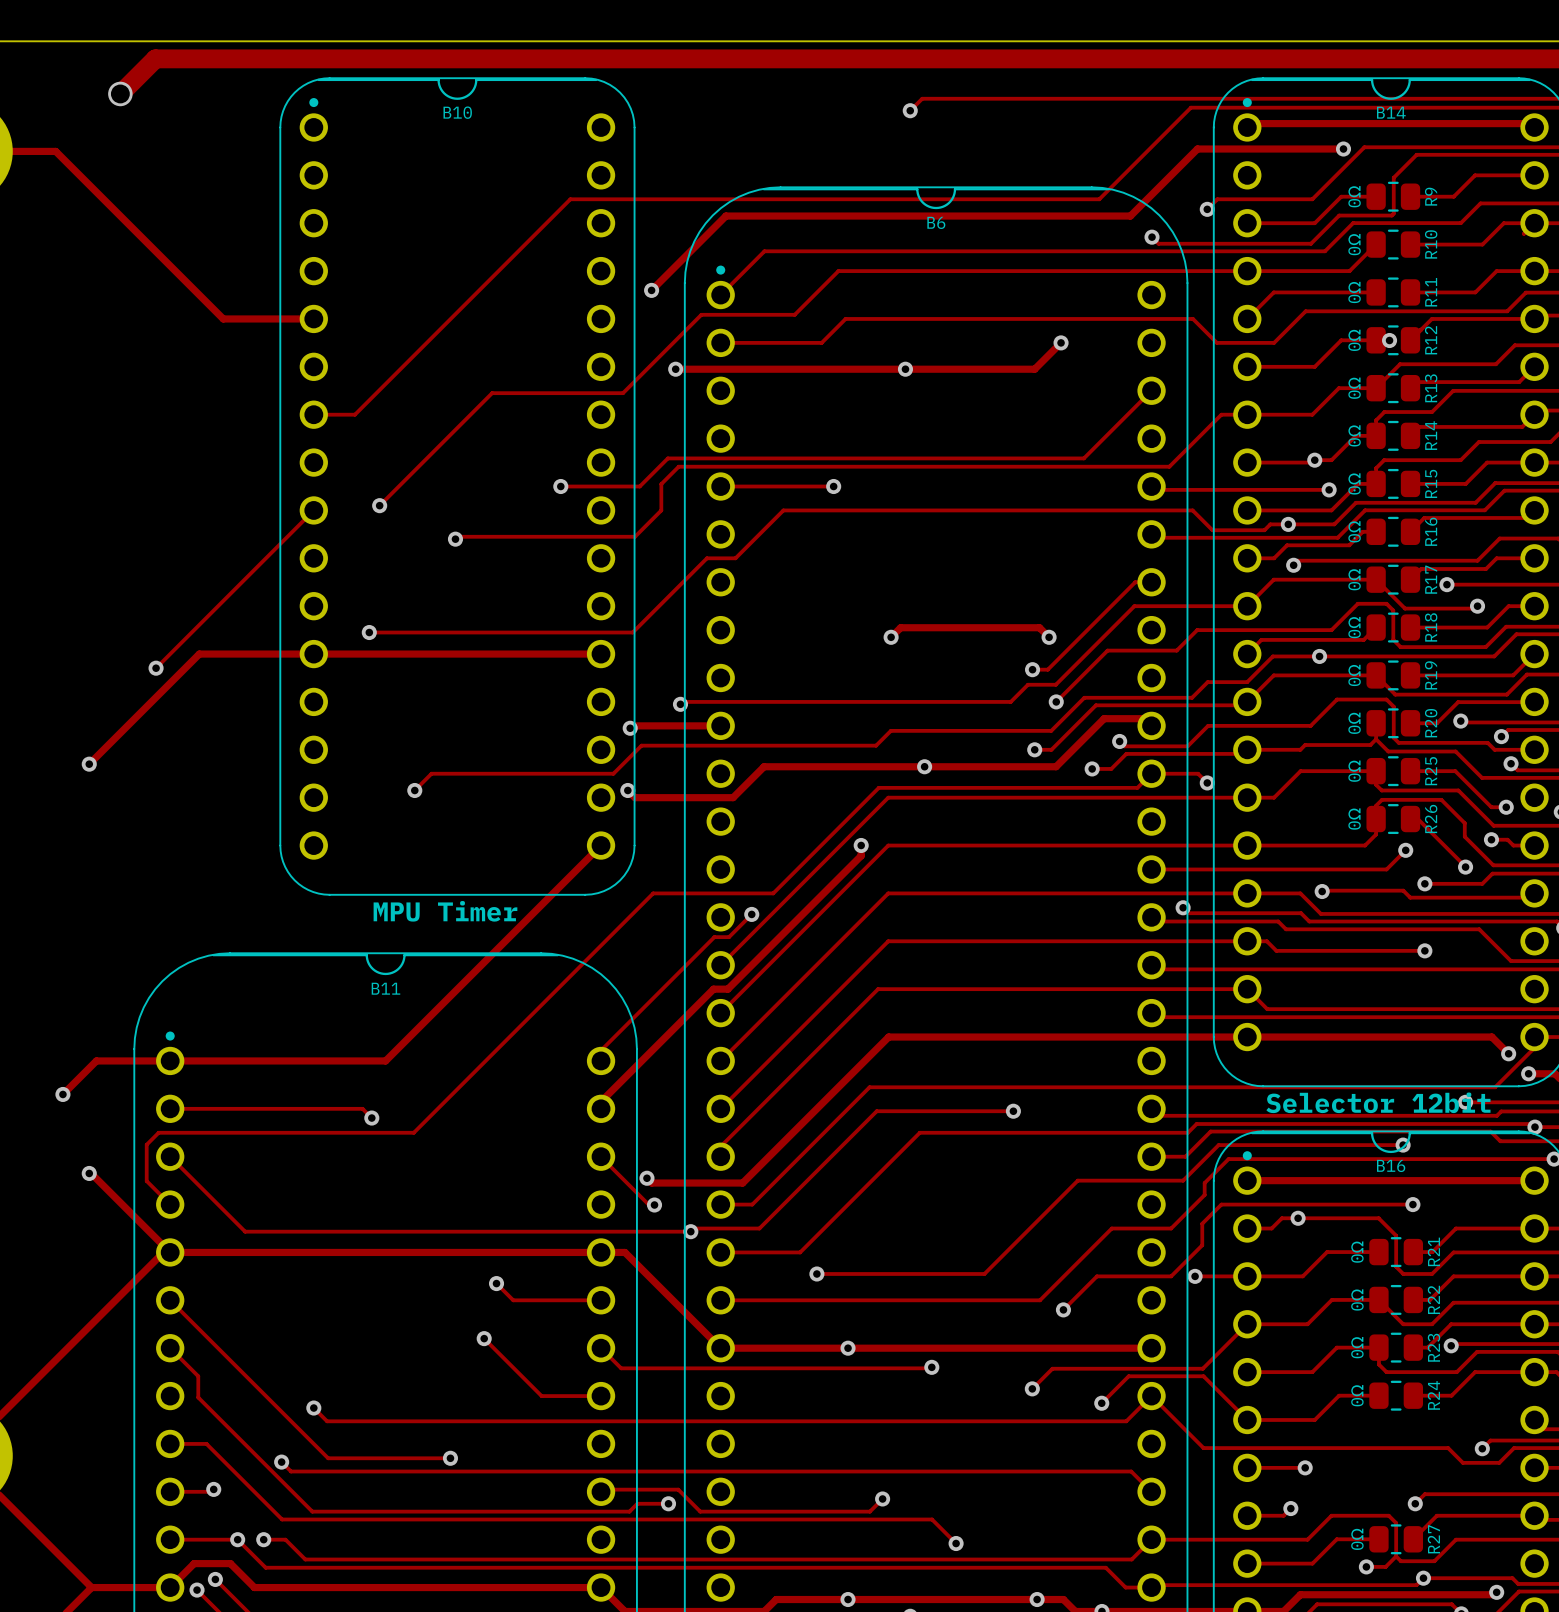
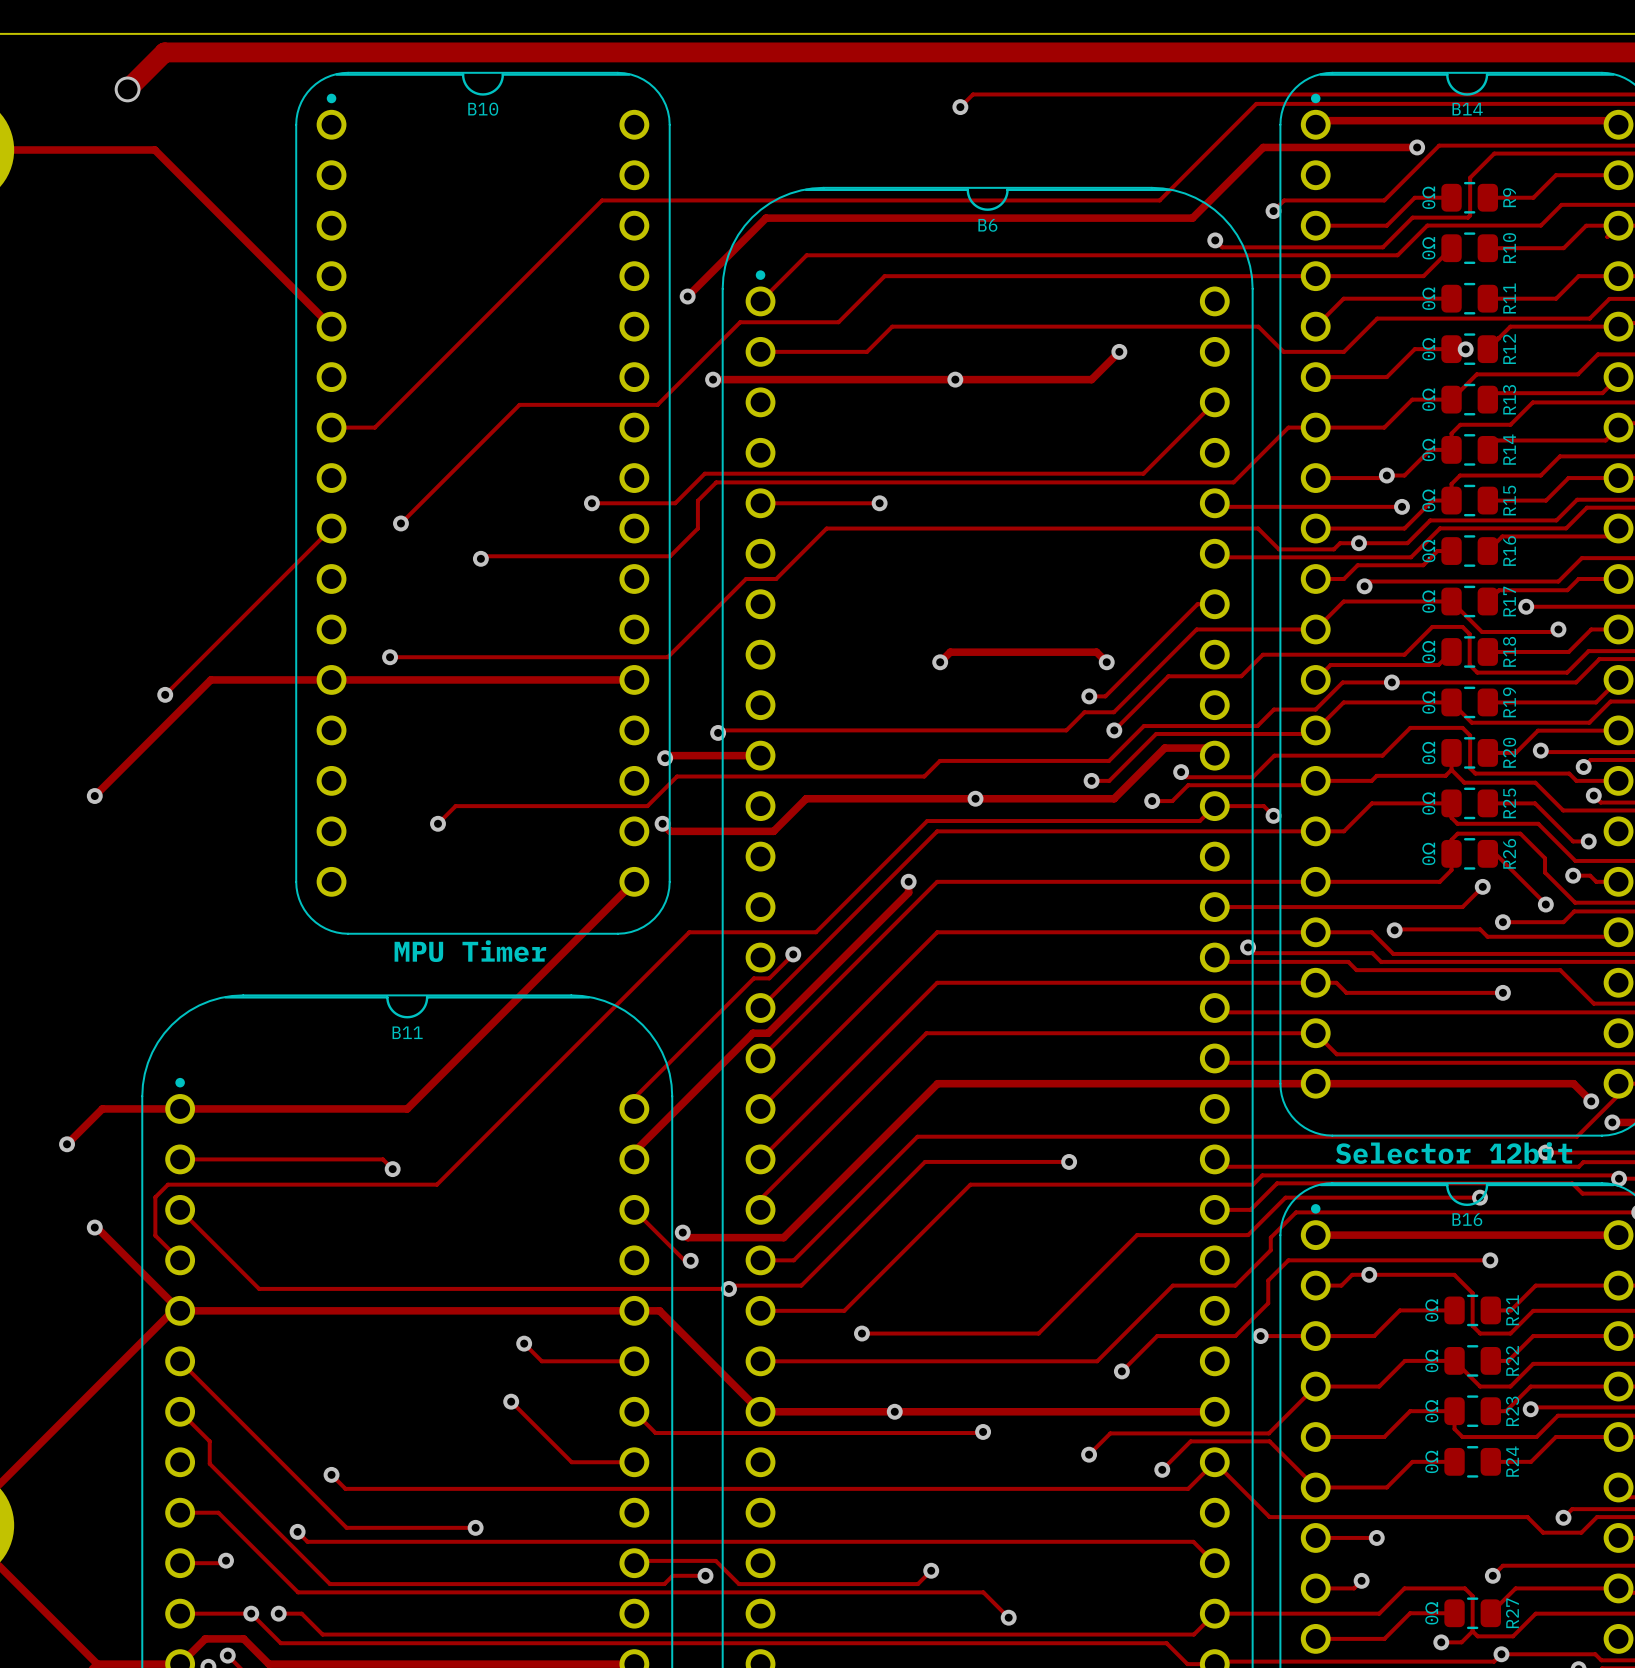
track: (55, 151) (223, 318) (313, 318) -> (59, 149) (154, 149) (331, 326)

